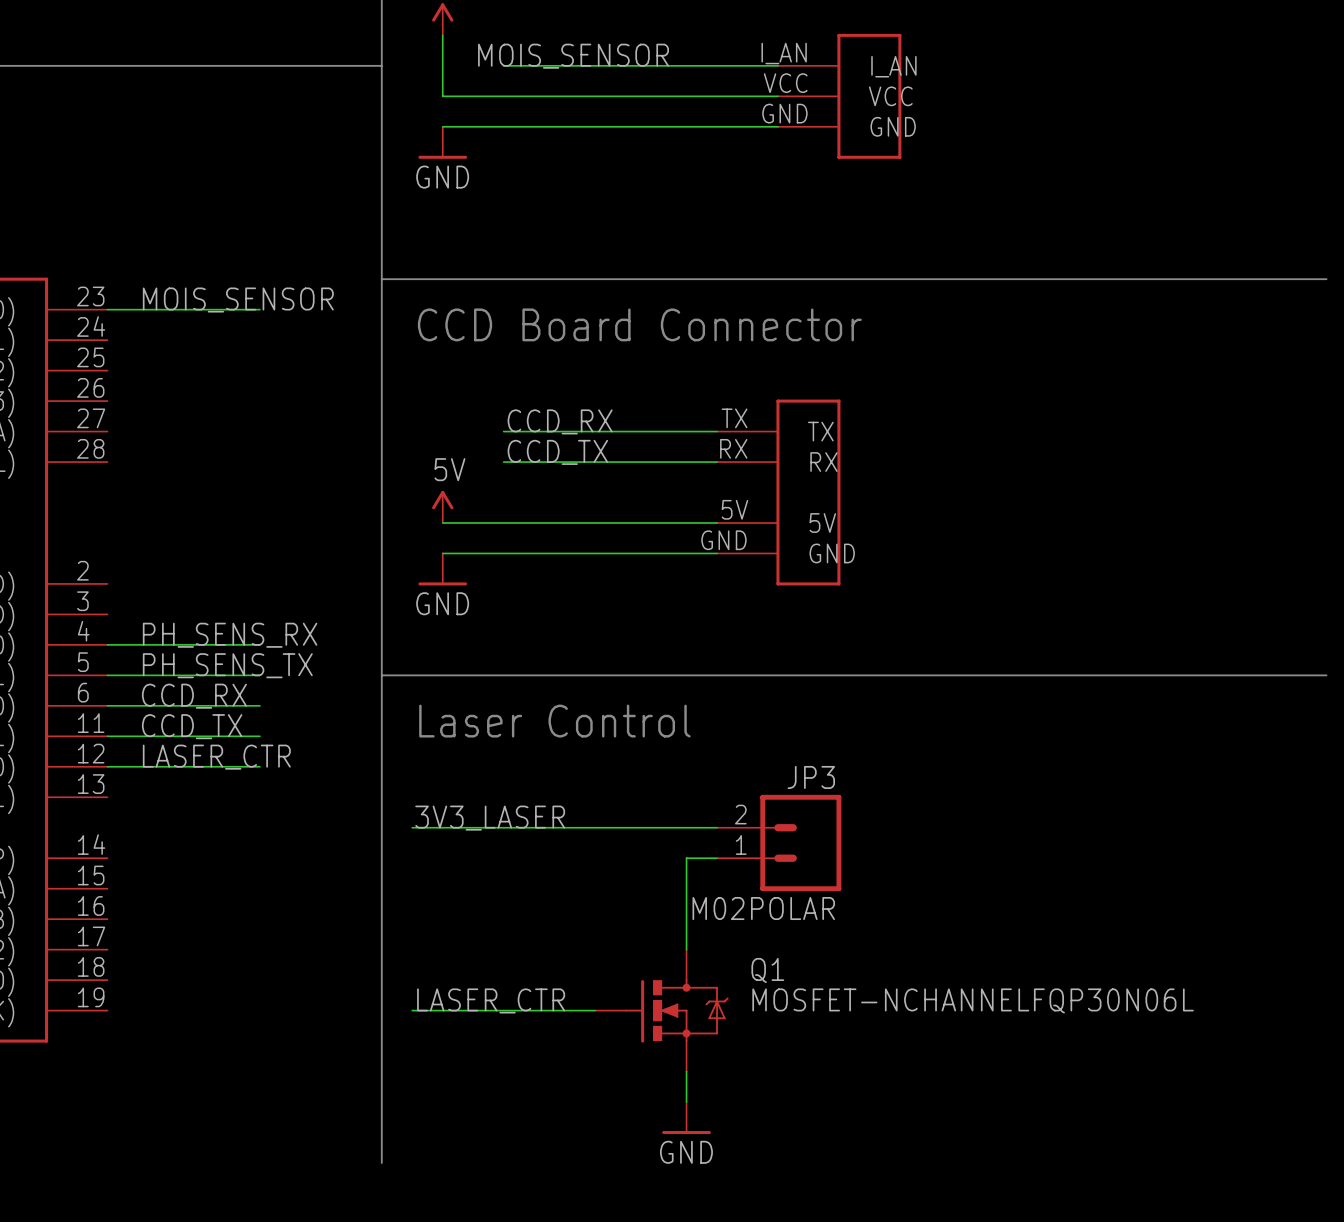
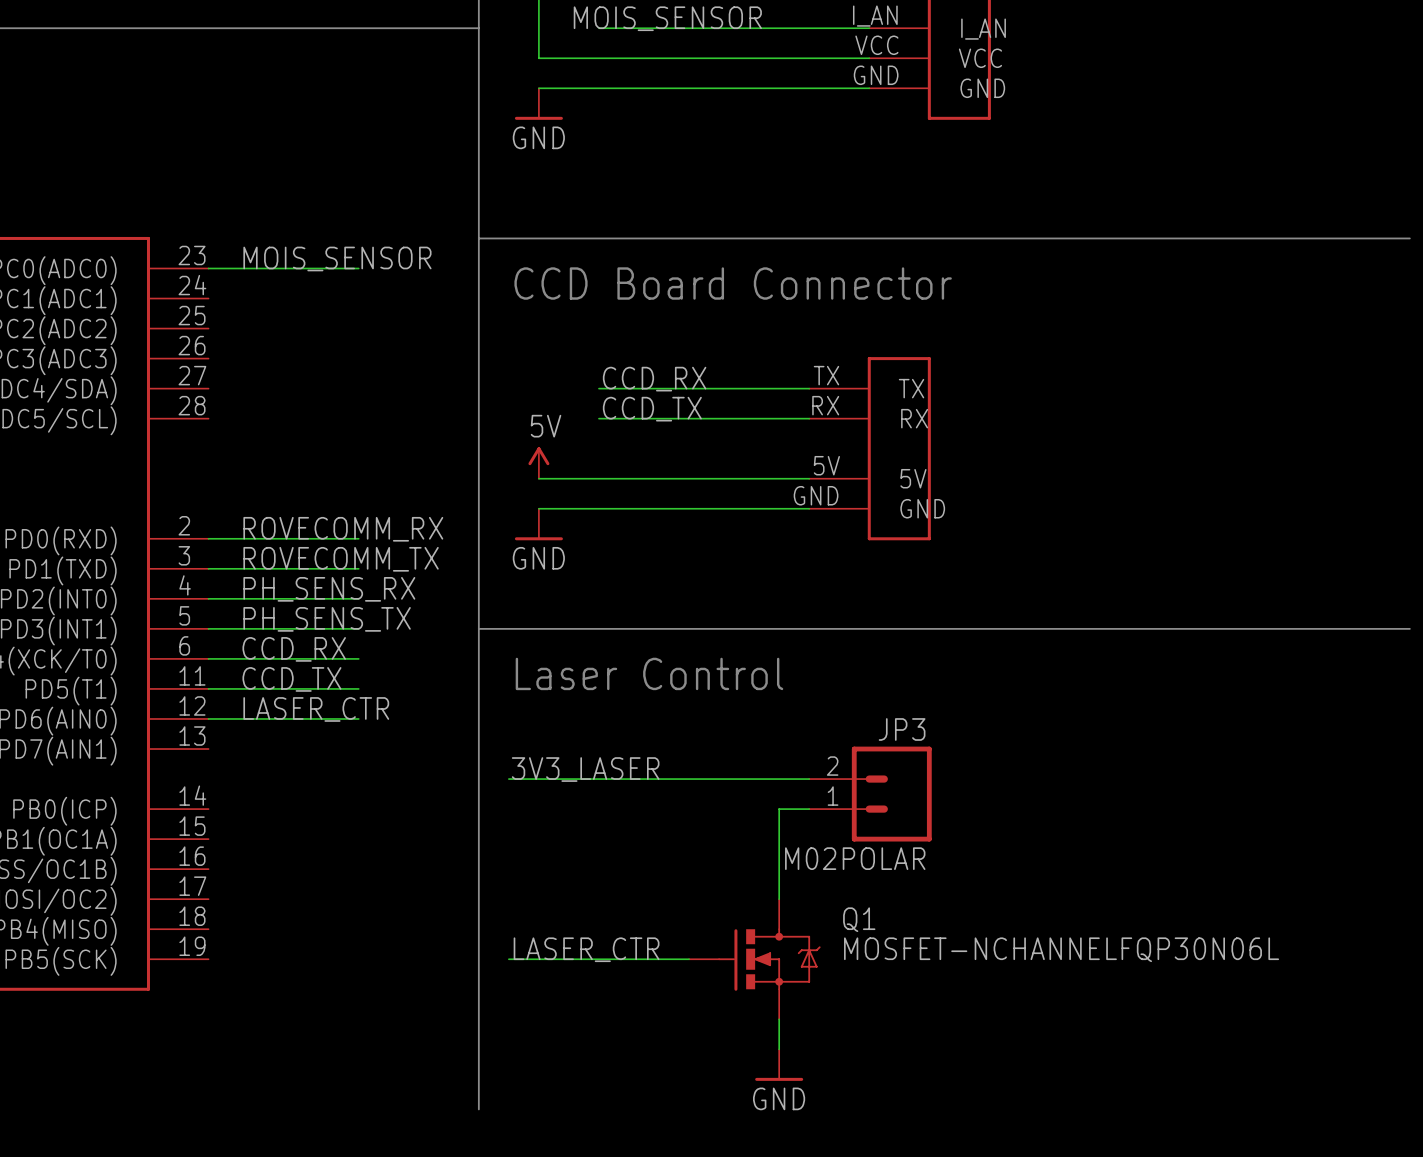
label: none -> ROVECOMM_RX (343, 529)
wire: none -> (208, 538) (358, 538)
label: none -> ROVECOMM_TX (341, 559)
wire: none -> (208, 568) (358, 568)

